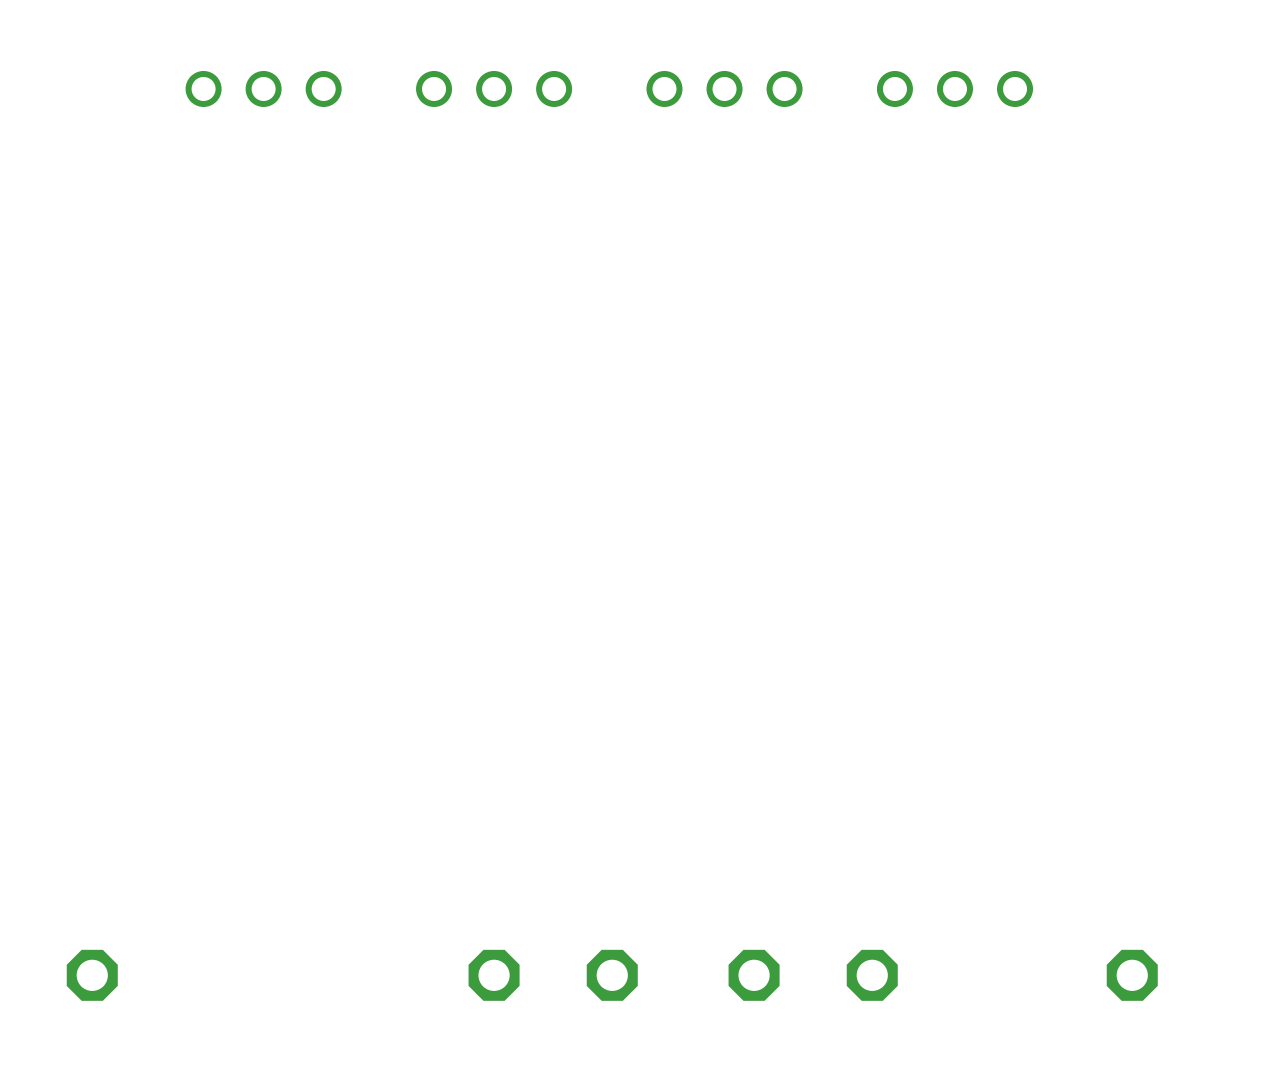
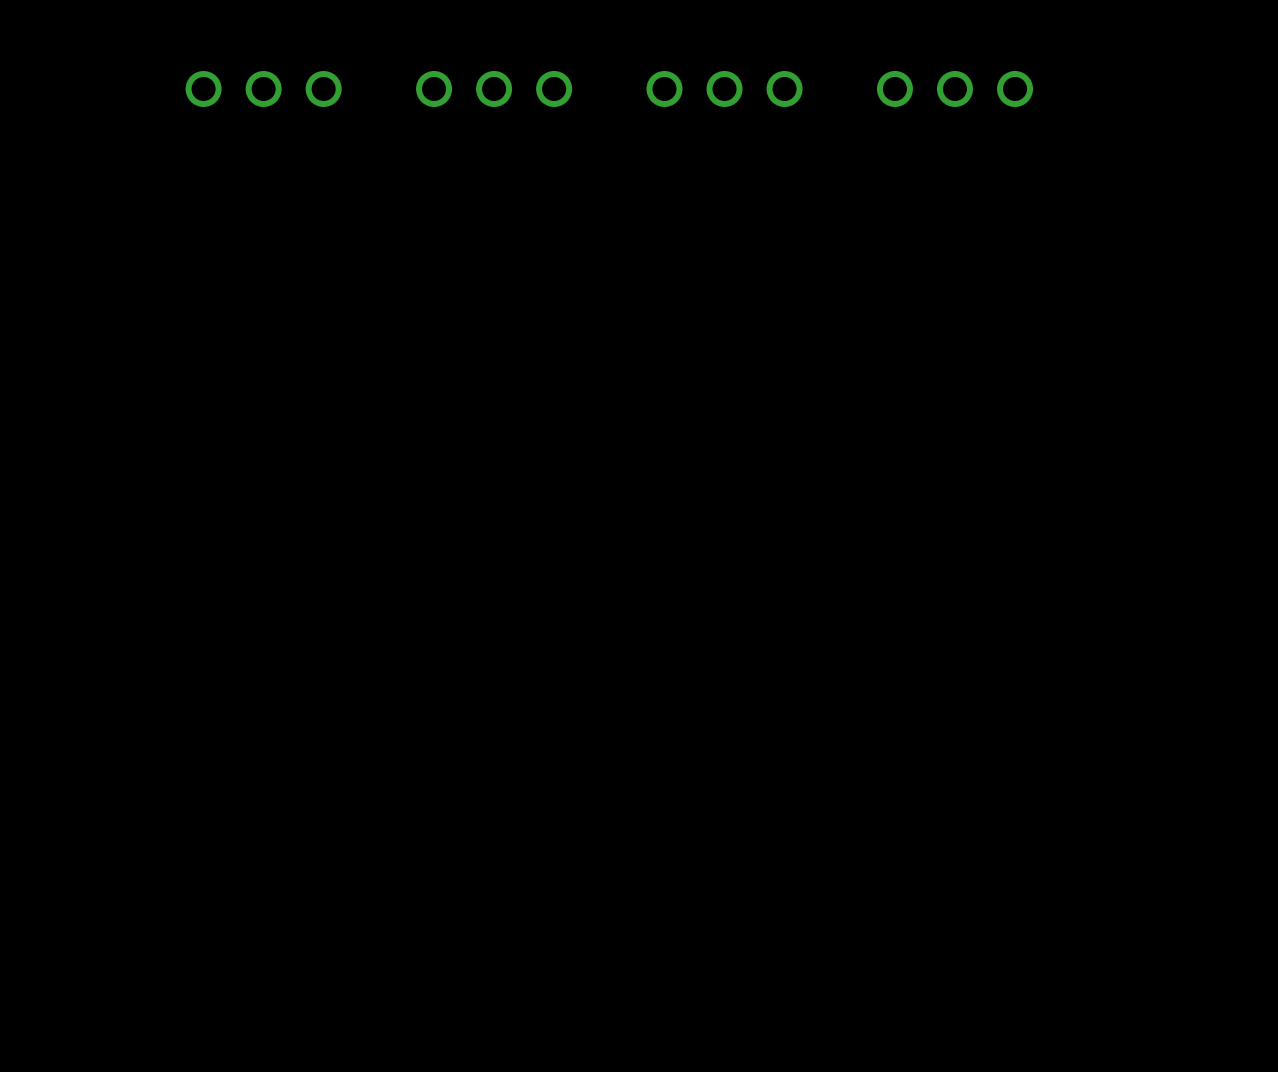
part: (92, 975) -> none
part: (494, 975) -> none
part: (612, 975) -> none
part: (754, 975) -> none
part: (872, 975) -> none
part: (1132, 975) -> none

